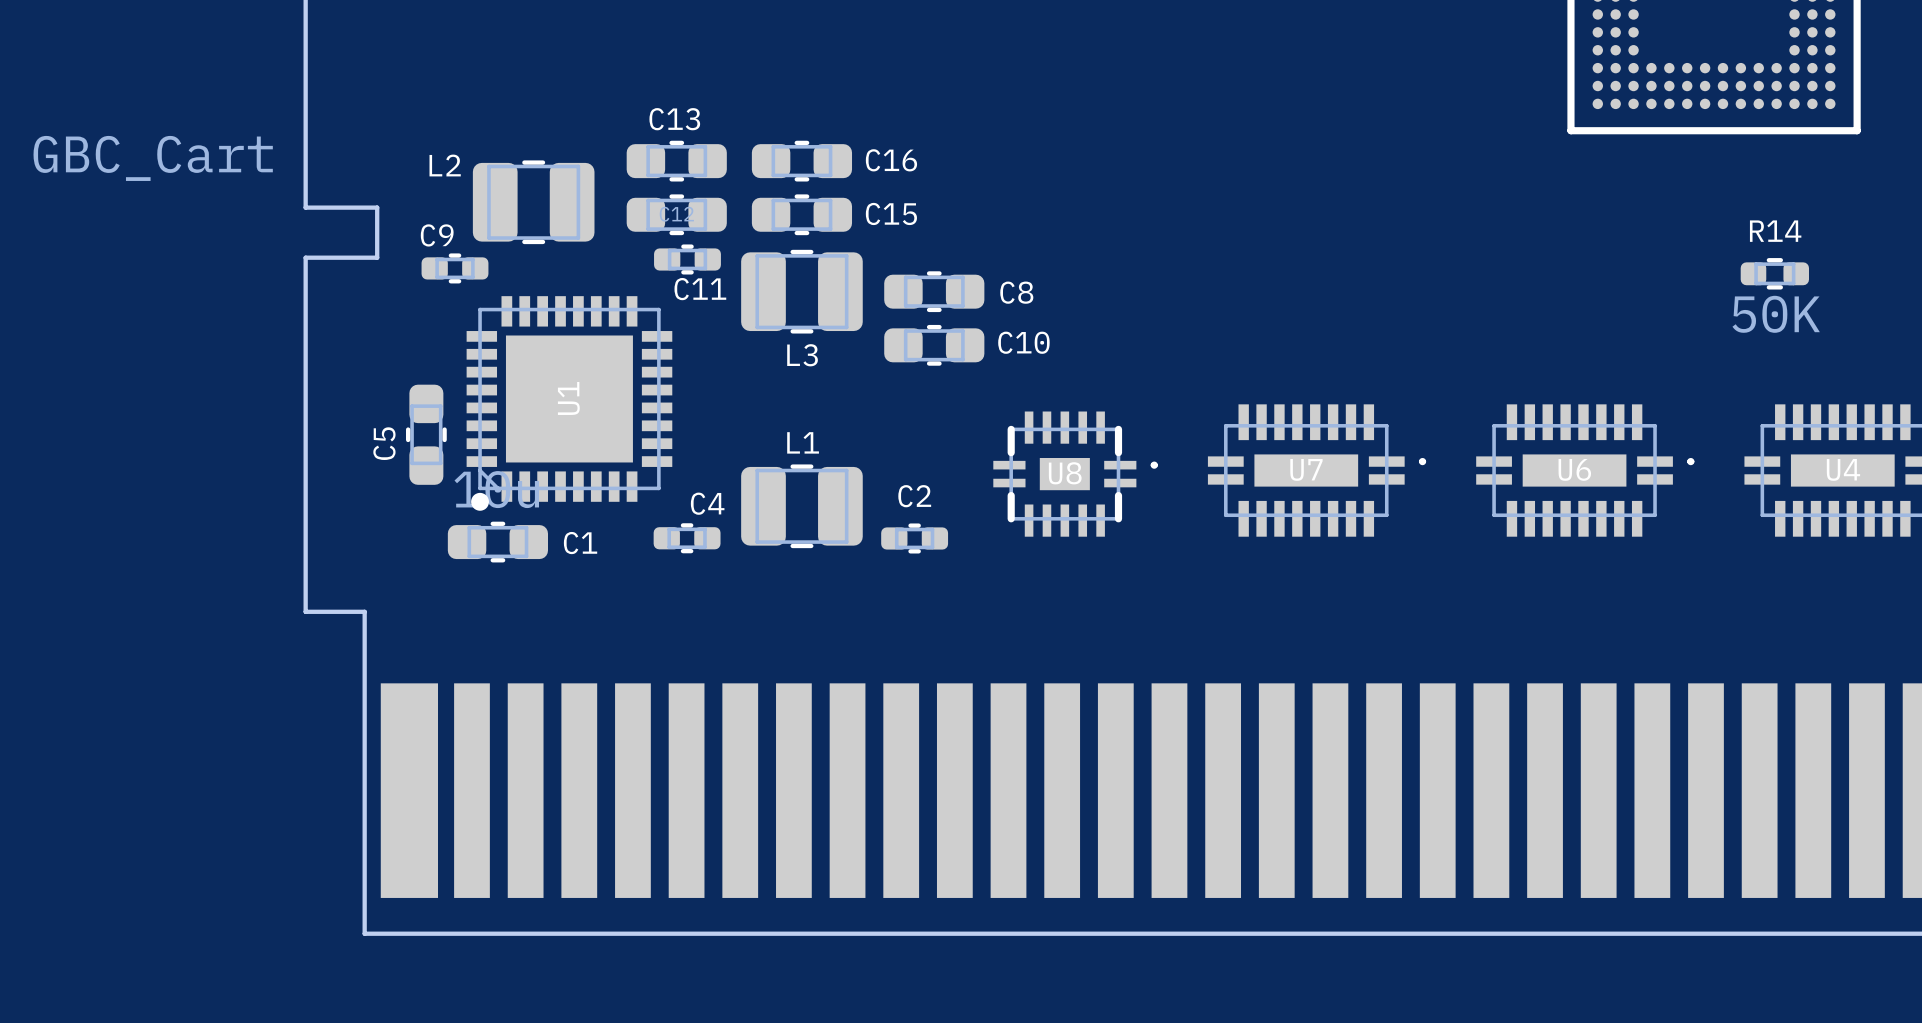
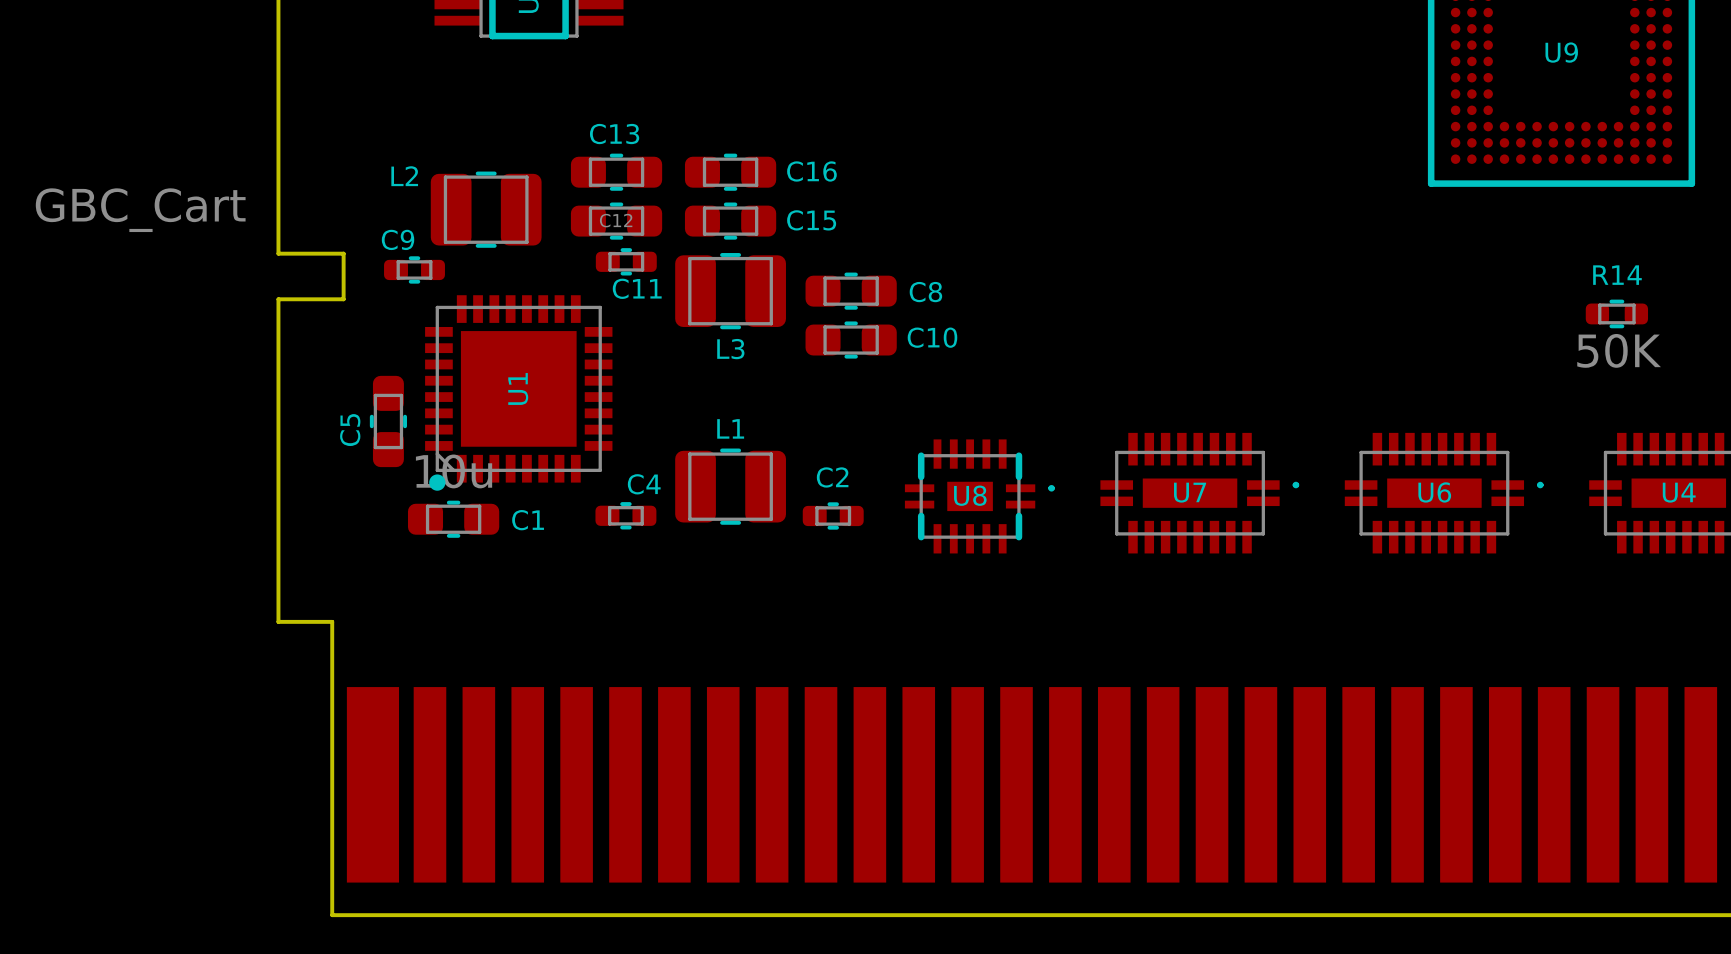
C13 position: (676, 161) -> (616, 172)
C16 position: (801, 161) -> (730, 172)
L2 position: (533, 202) -> (486, 209)
C12 position: (676, 214) -> (616, 221)
C15 position: (801, 214) -> (730, 221)
C11 position: (687, 259) -> (626, 261)
C9 position: (454, 268) -> (414, 269)
L3 position: (801, 291) -> (730, 291)
C8 position: (934, 291) -> (851, 291)
C10 position: (934, 345) -> (851, 340)
U1 position: (569, 403) -> (518, 392)
C5 position: (426, 434) -> (388, 421)
L1 position: (801, 506) -> (730, 486)
C4 position: (687, 538) -> (625, 515)
C2 position: (914, 538) -> (833, 515)
C1 position: (497, 542) -> (453, 519)

